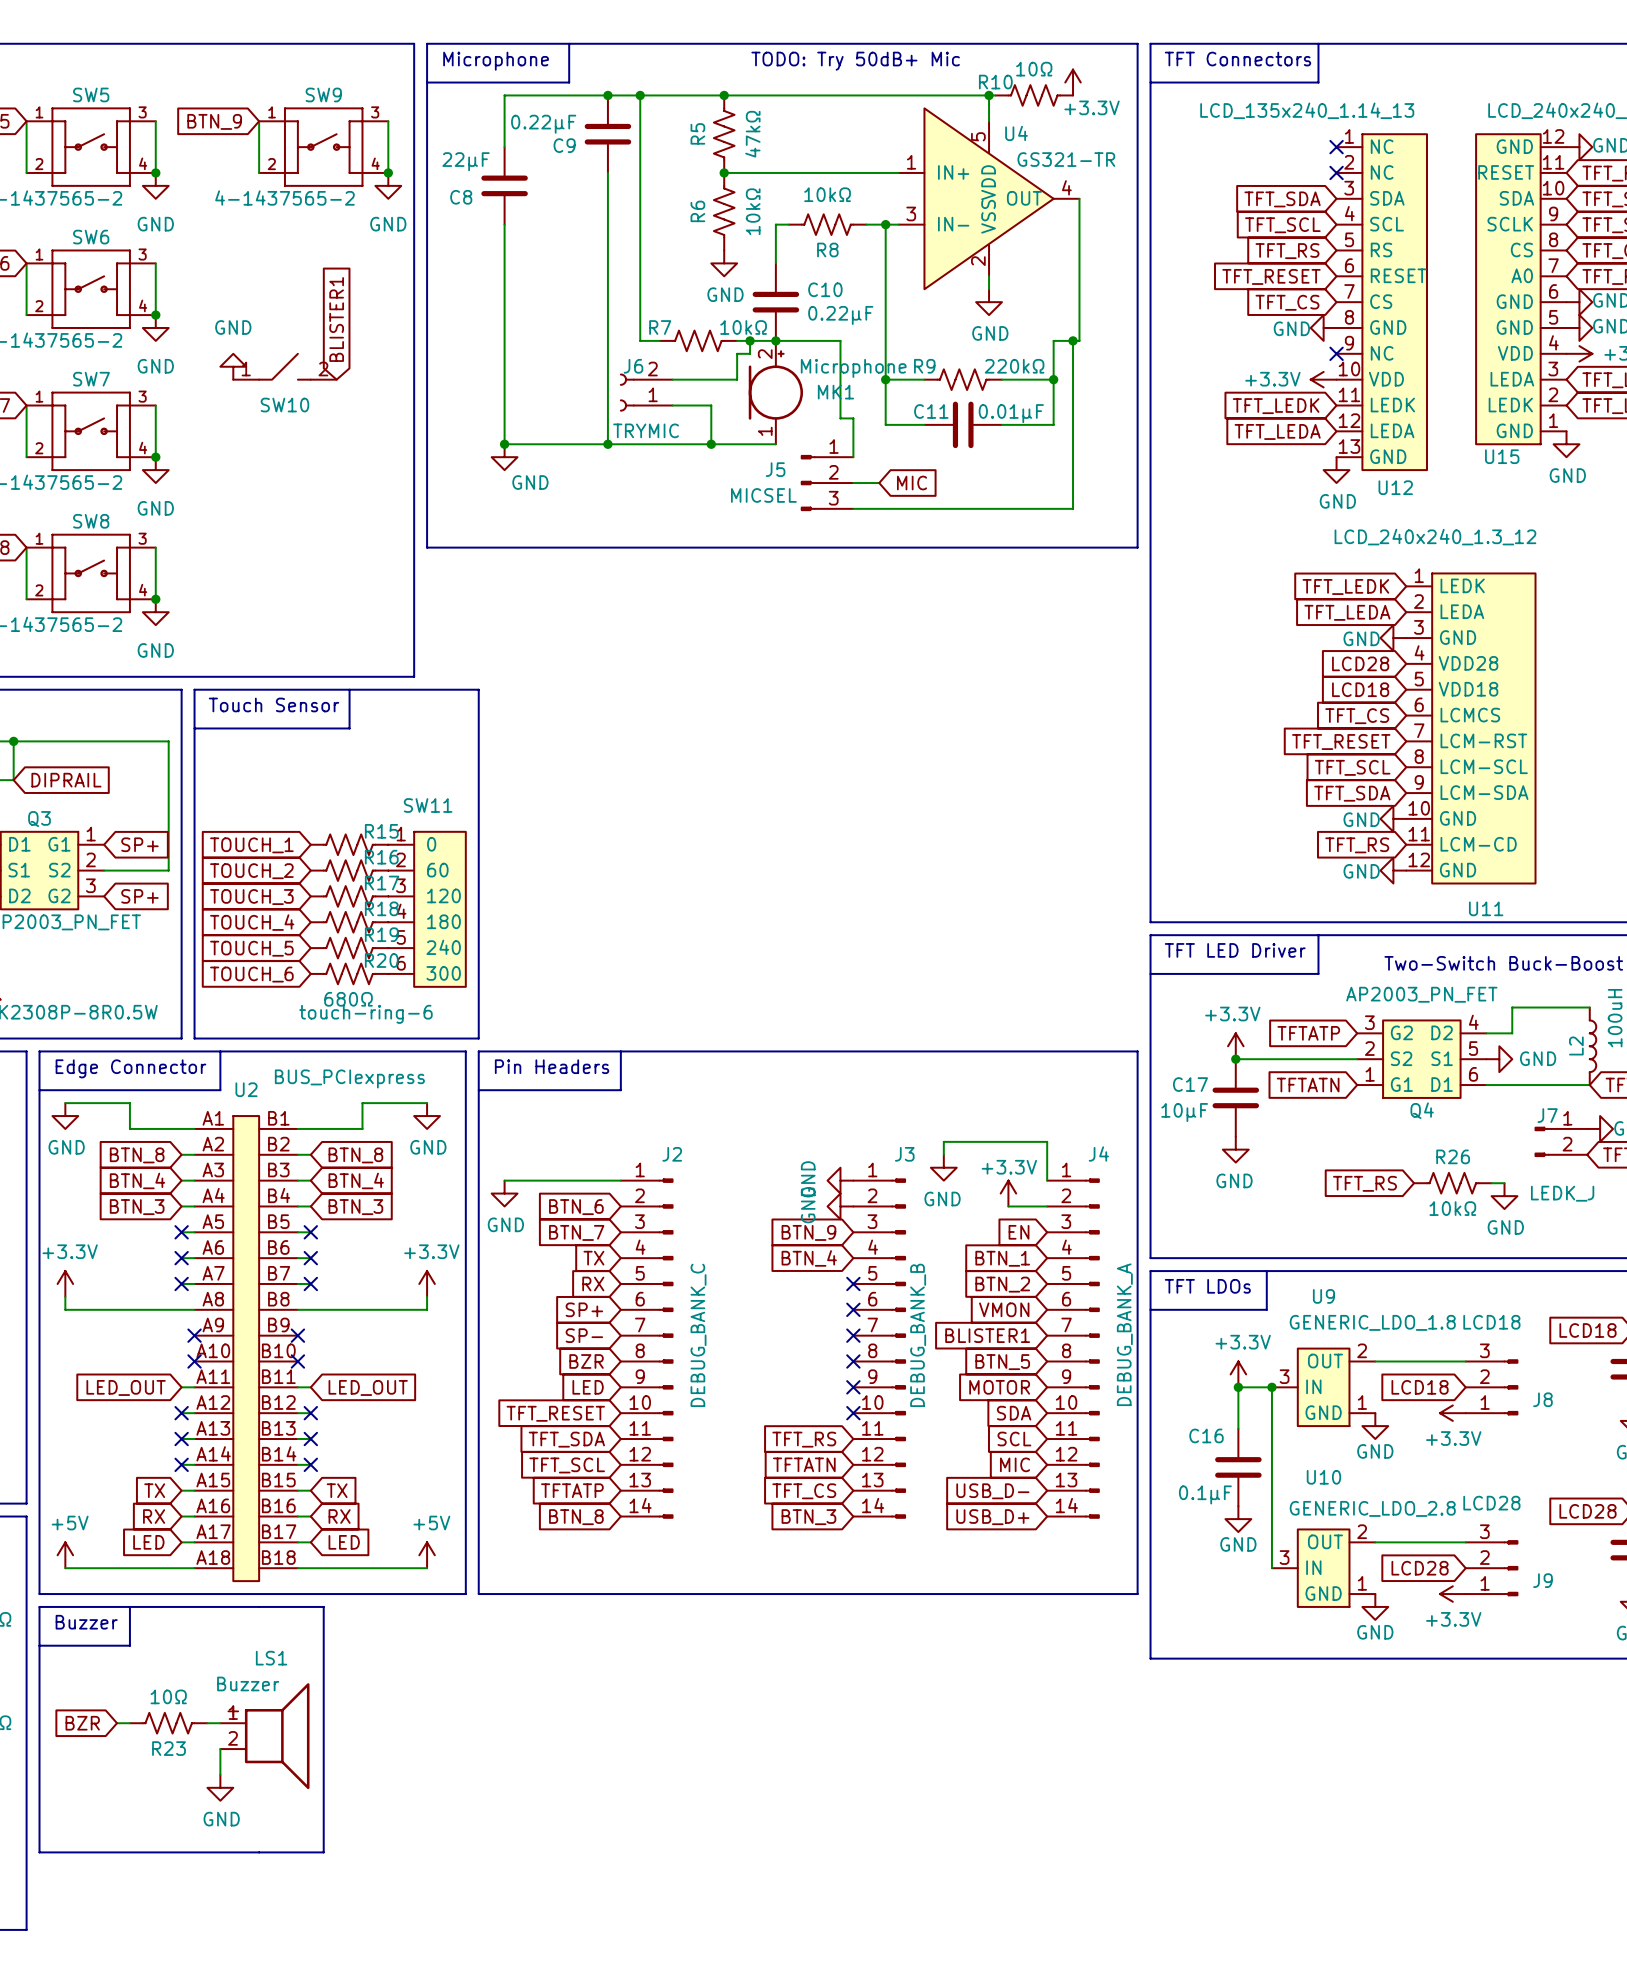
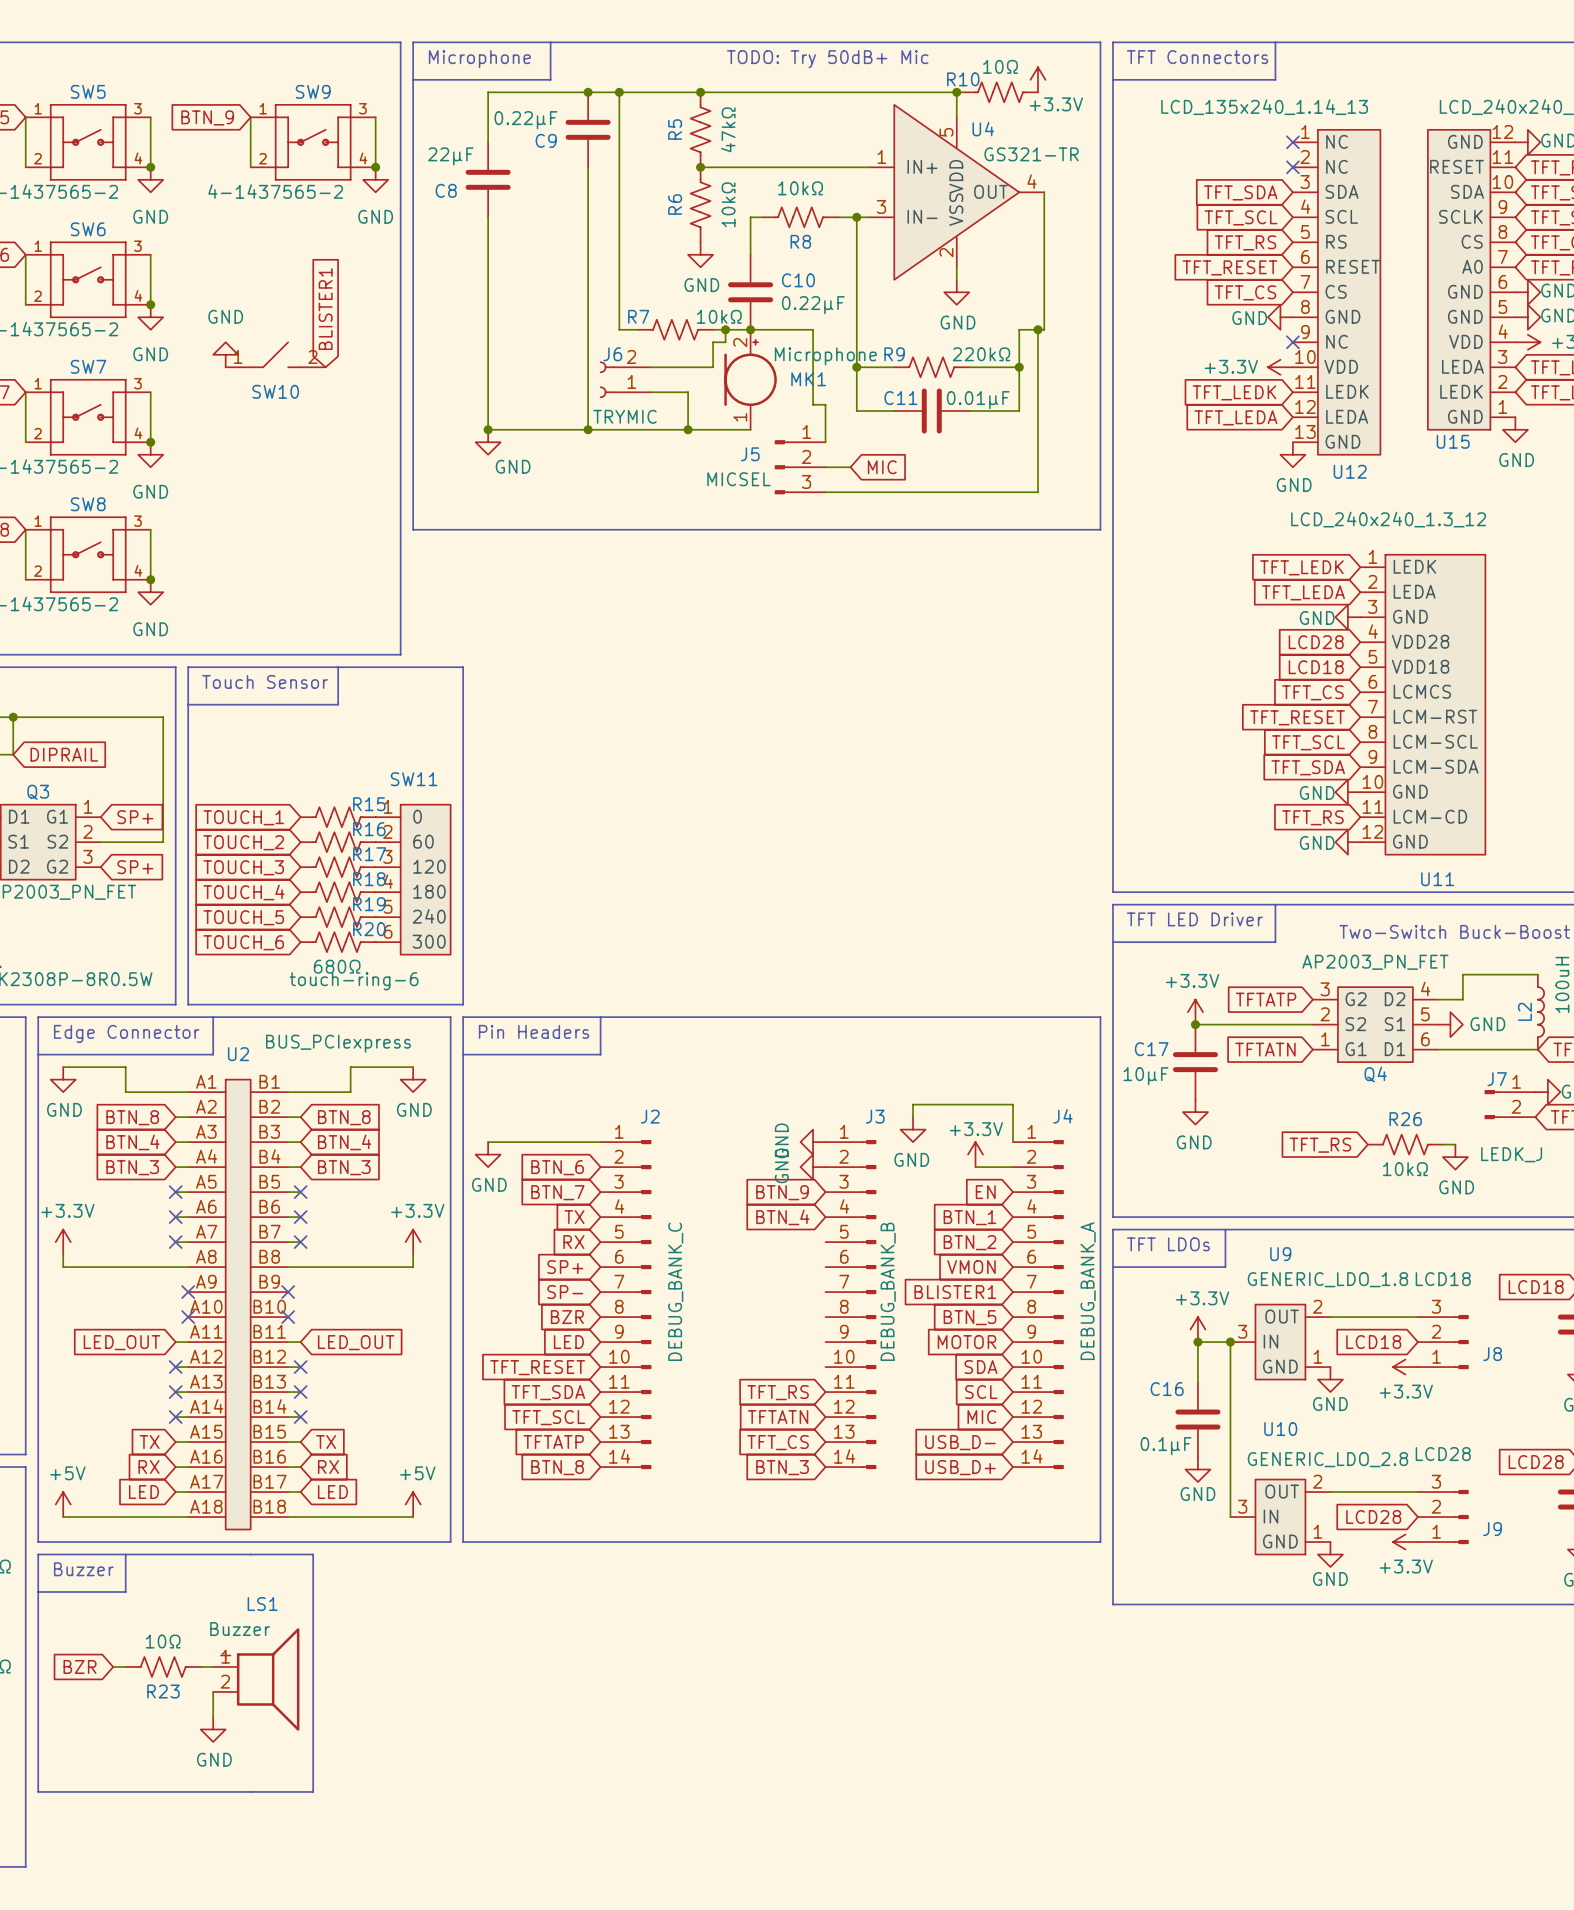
no-connect mark: (853, 1283) -> none
no-connect mark: (853, 1309) -> none
no-connect mark: (853, 1335) -> none
no-connect mark: (853, 1361) -> none
no-connect mark: (853, 1387) -> none
no-connect mark: (853, 1413) -> none

